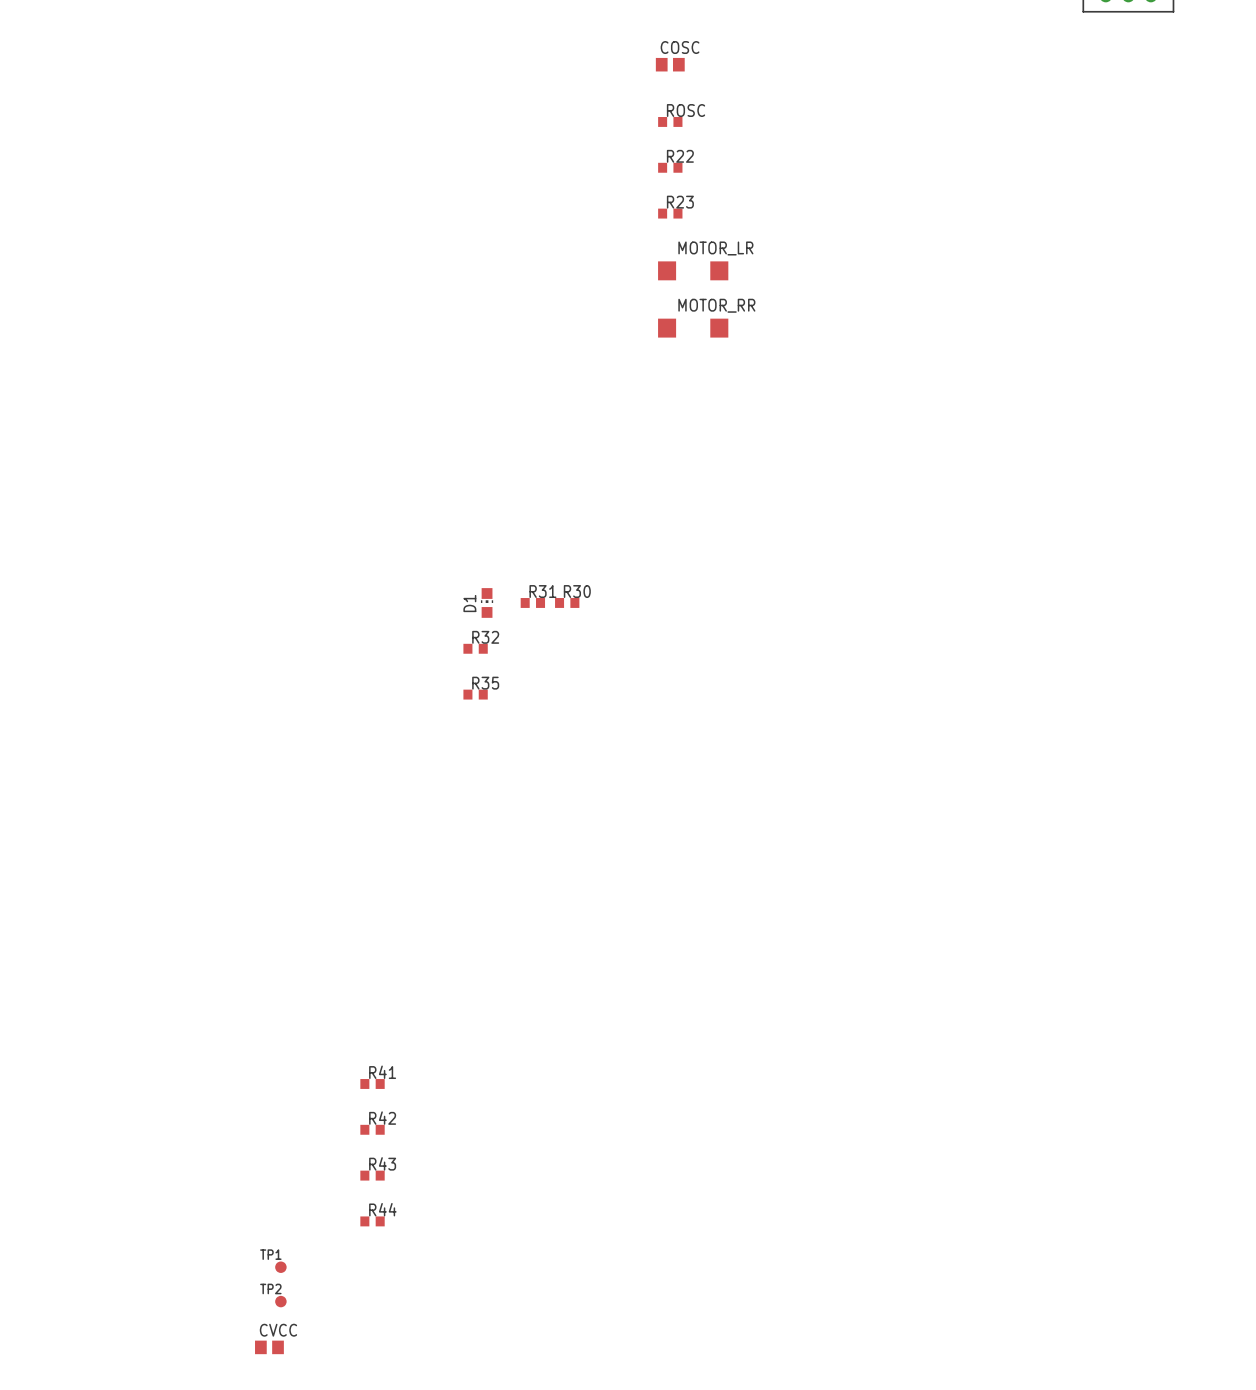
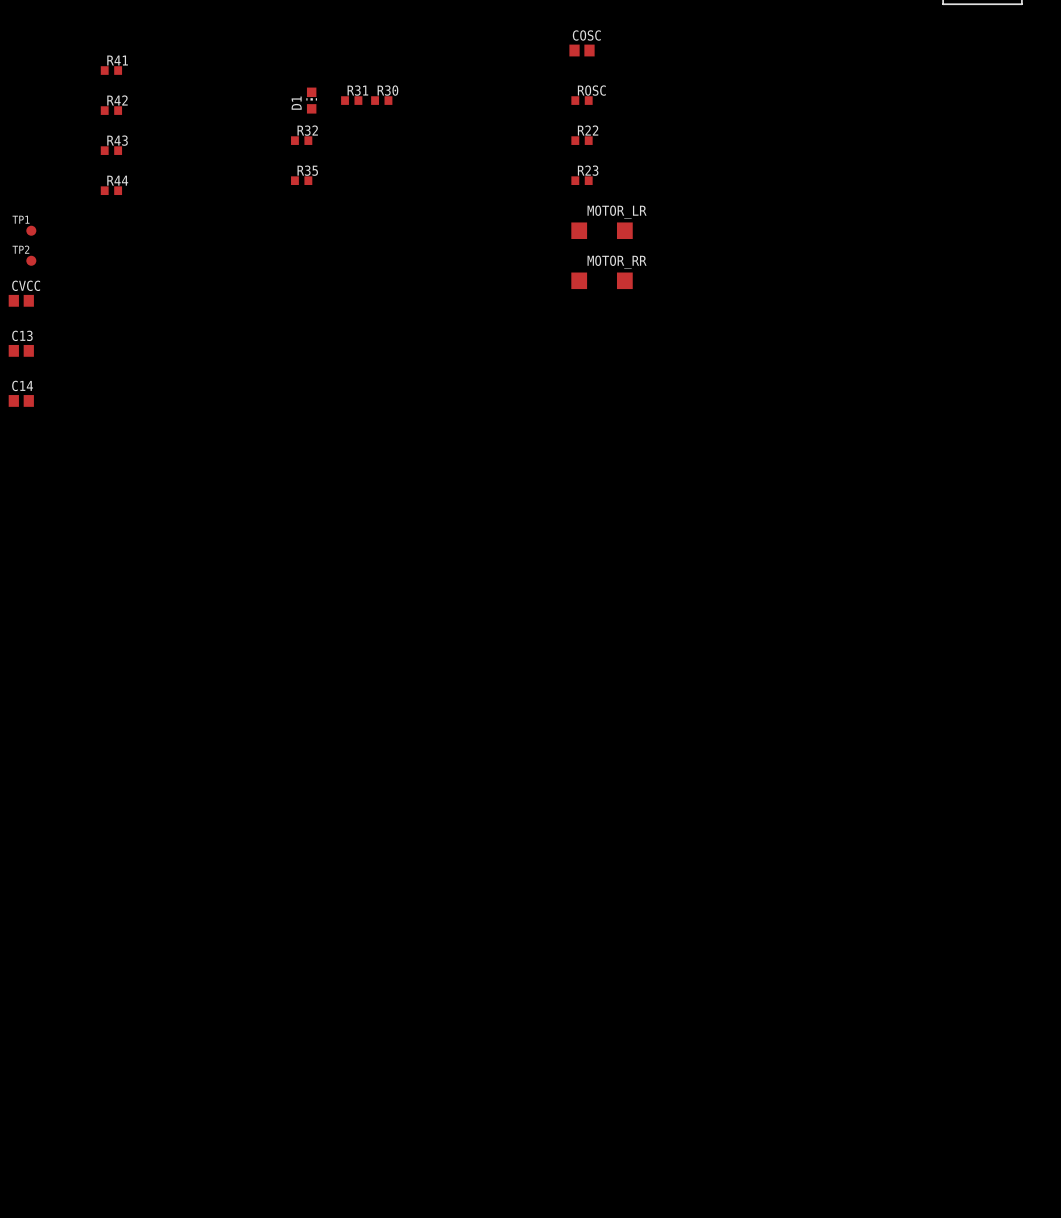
CVCC: none -> (21, 300)
C13: none -> (21, 350)
C14: none -> (21, 400)
D1 position: (487, 602) -> (311, 100)
R31 position: (532, 602) -> (351, 100)
R30 position: (567, 602) -> (381, 100)
R32 position: (475, 648) -> (301, 140)
R35 position: (475, 694) -> (301, 180)
R41 position: (372, 1083) -> (111, 70)
R42 position: (372, 1129) -> (111, 110)
R43 position: (372, 1175) -> (111, 150)
R44 position: (372, 1221) -> (111, 190)
TP1 position: (280, 1267) -> (31, 230)
TP2 position: (280, 1301) -> (31, 260)
CVCC: (269, 1347) -> none

